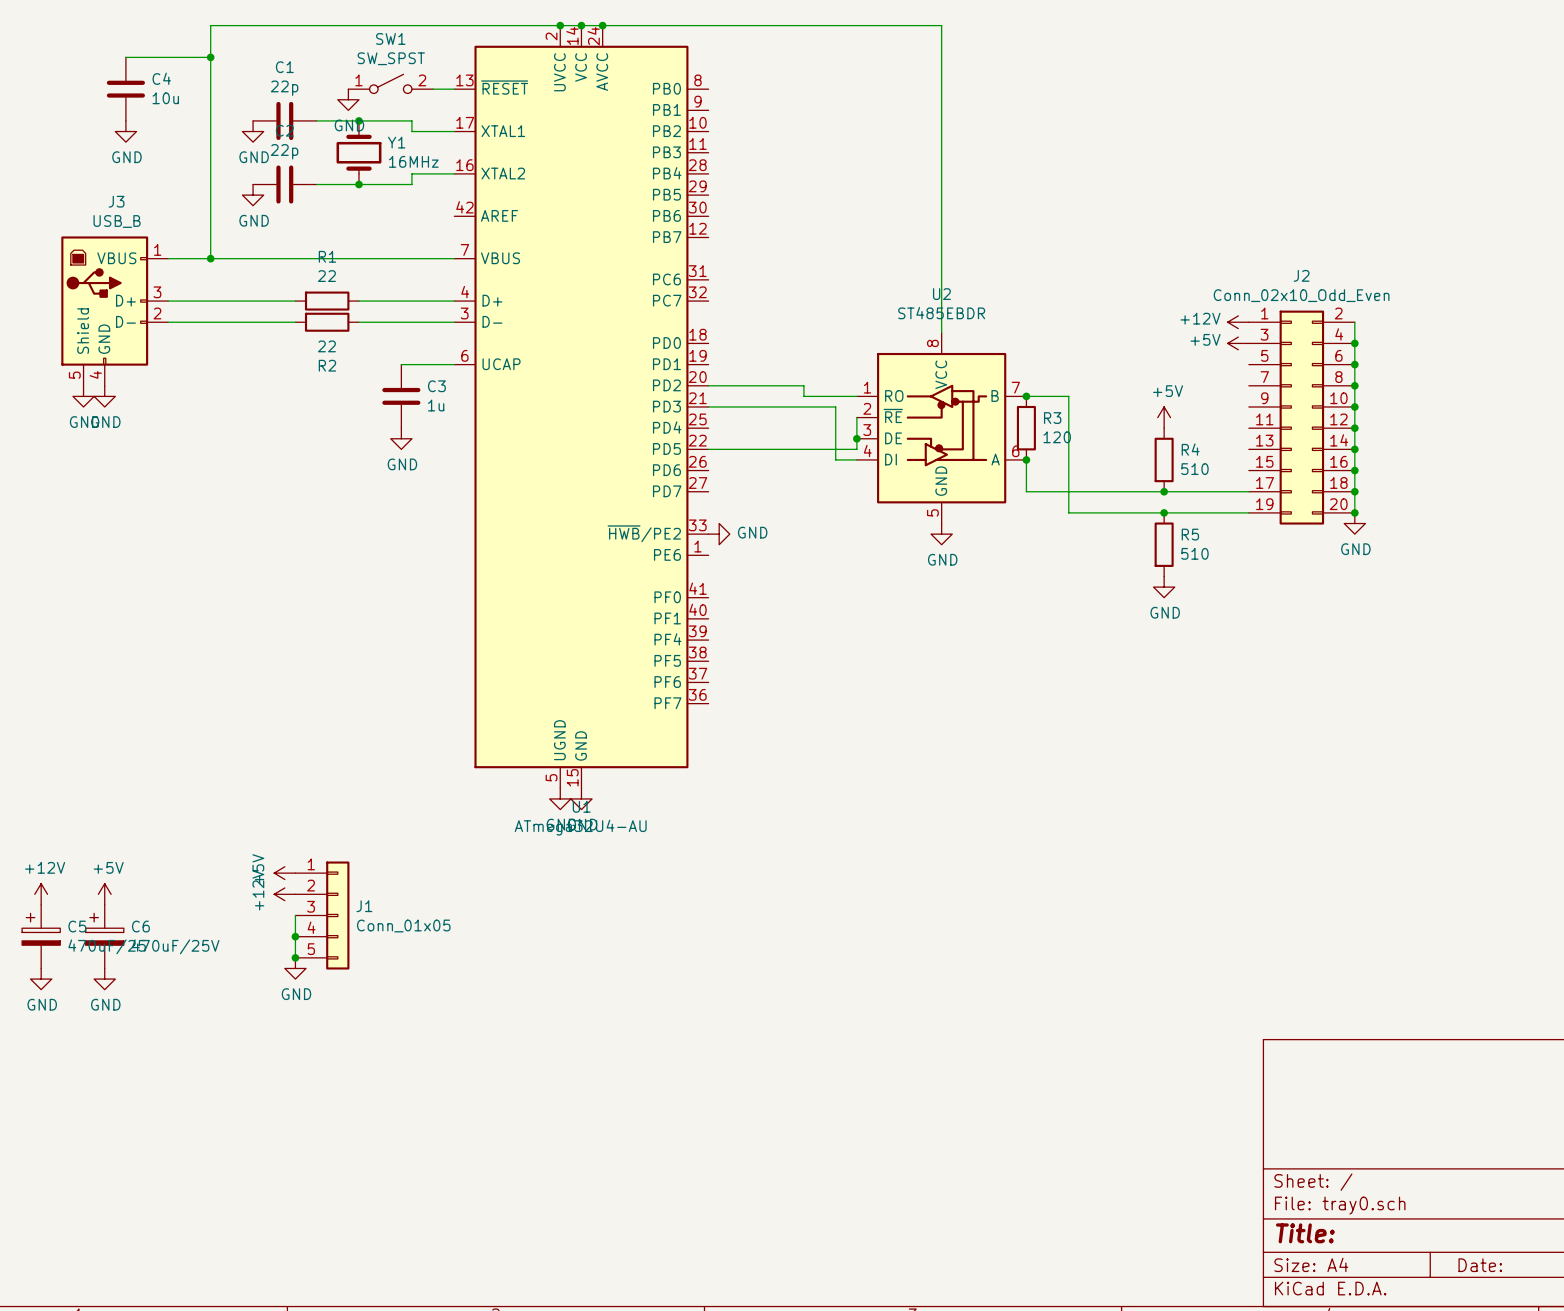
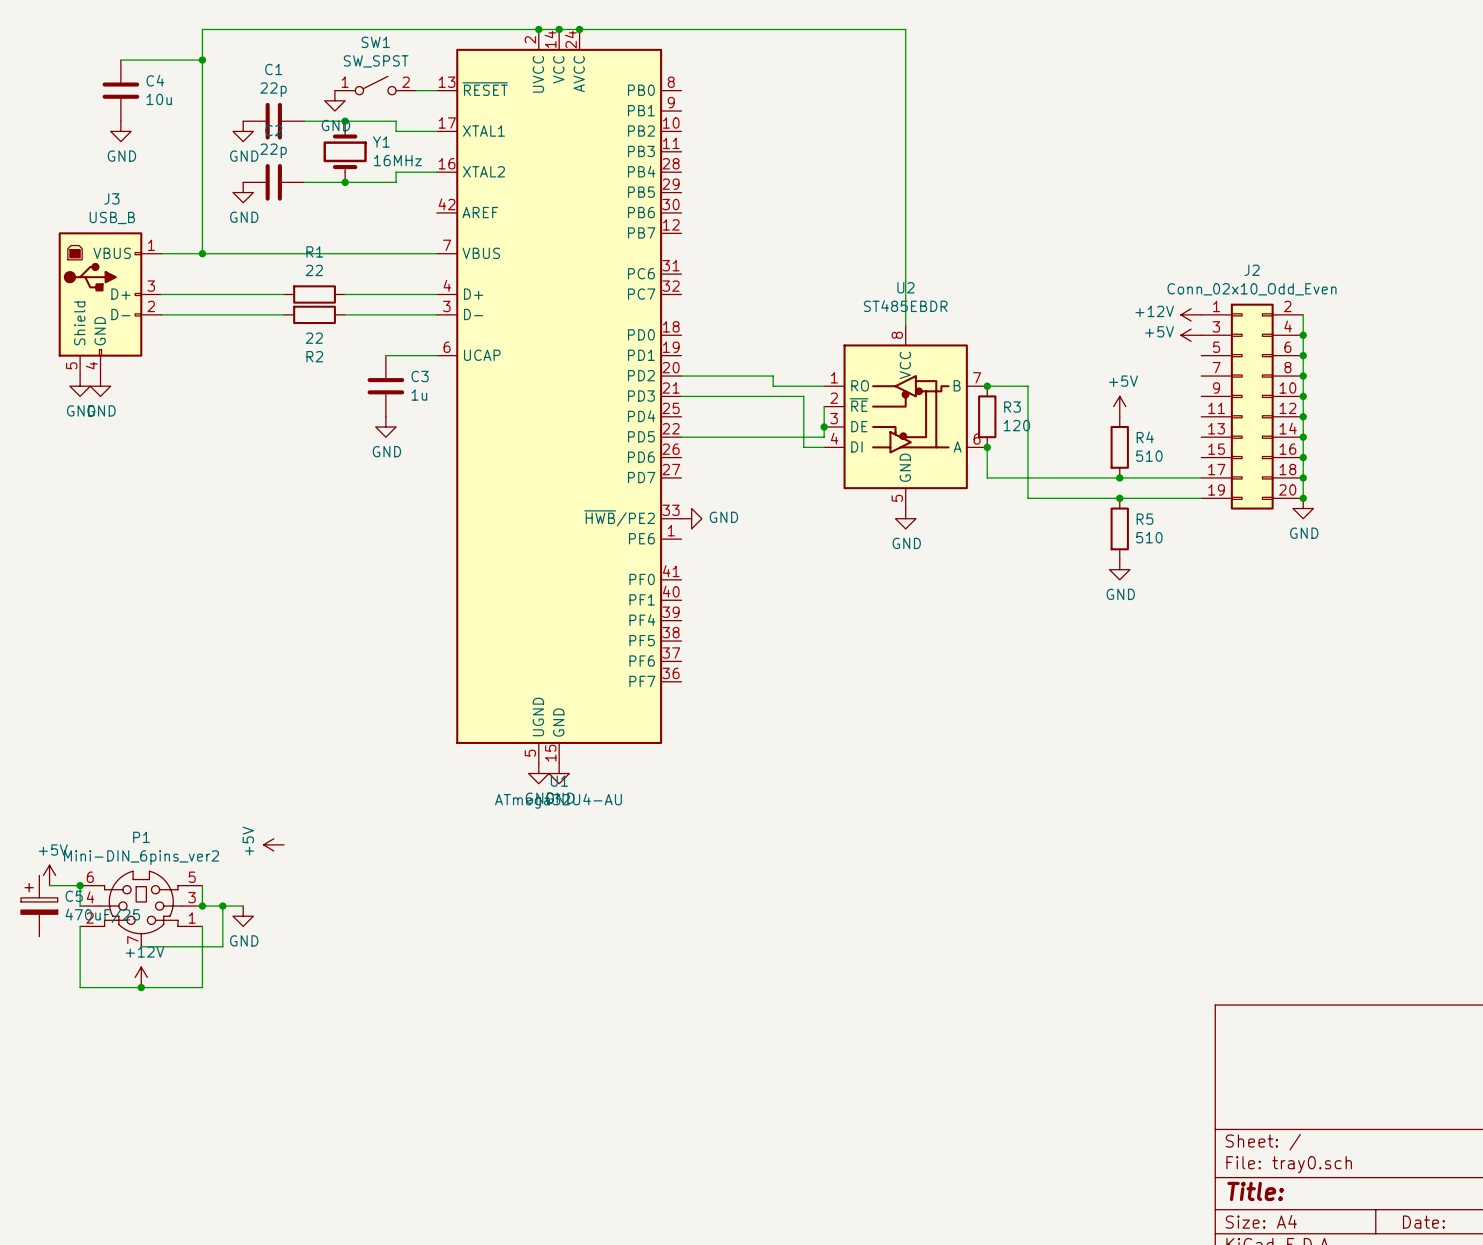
power symbol: +12V (41, 894) -> none
power symbol position: +5V (104, 894) -> +5V (49, 875)
power symbol: +12V (284, 894) -> none
wire: none -> (49, 885) (80, 885) (80, 906)
junction: none -> (80, 885)
wire: none -> (202, 885) (202, 906) (243, 906)
wire: (295, 915) (295, 957) -> none
J1: Conn_01x05 (322, 915) -> none
C6: 470uF/25V (104, 936) -> none
junction: none -> (202, 906)
wire: none -> (222, 906) (222, 946) (141, 946)
junction: none -> (222, 906)
junction: (295, 936) -> none
P1: none -> Mini-DIN_6pins_ver2 (141, 908)
wire: none -> (80, 926) (80, 987) (202, 987) (202, 926)
junction: (295, 957) -> none
power symbol position: GND (295, 968) -> GND (243, 916)
power symbol: GND (41, 979) -> none
power symbol: GND (104, 979) -> none
power symbol: none -> +12V (141, 977)
junction: none -> (141, 987)

